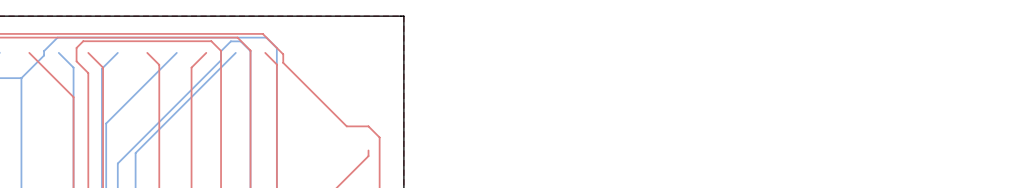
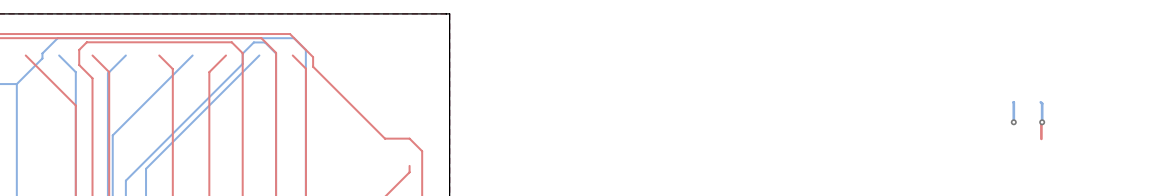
bottom track: none -> (1013, 102) (1013, 122)
bottom track: none -> (1040, 102) (1042, 122)
via: none -> (1013, 122)
top track: none -> (1042, 122) (1041, 138)
via: none -> (1042, 122)

